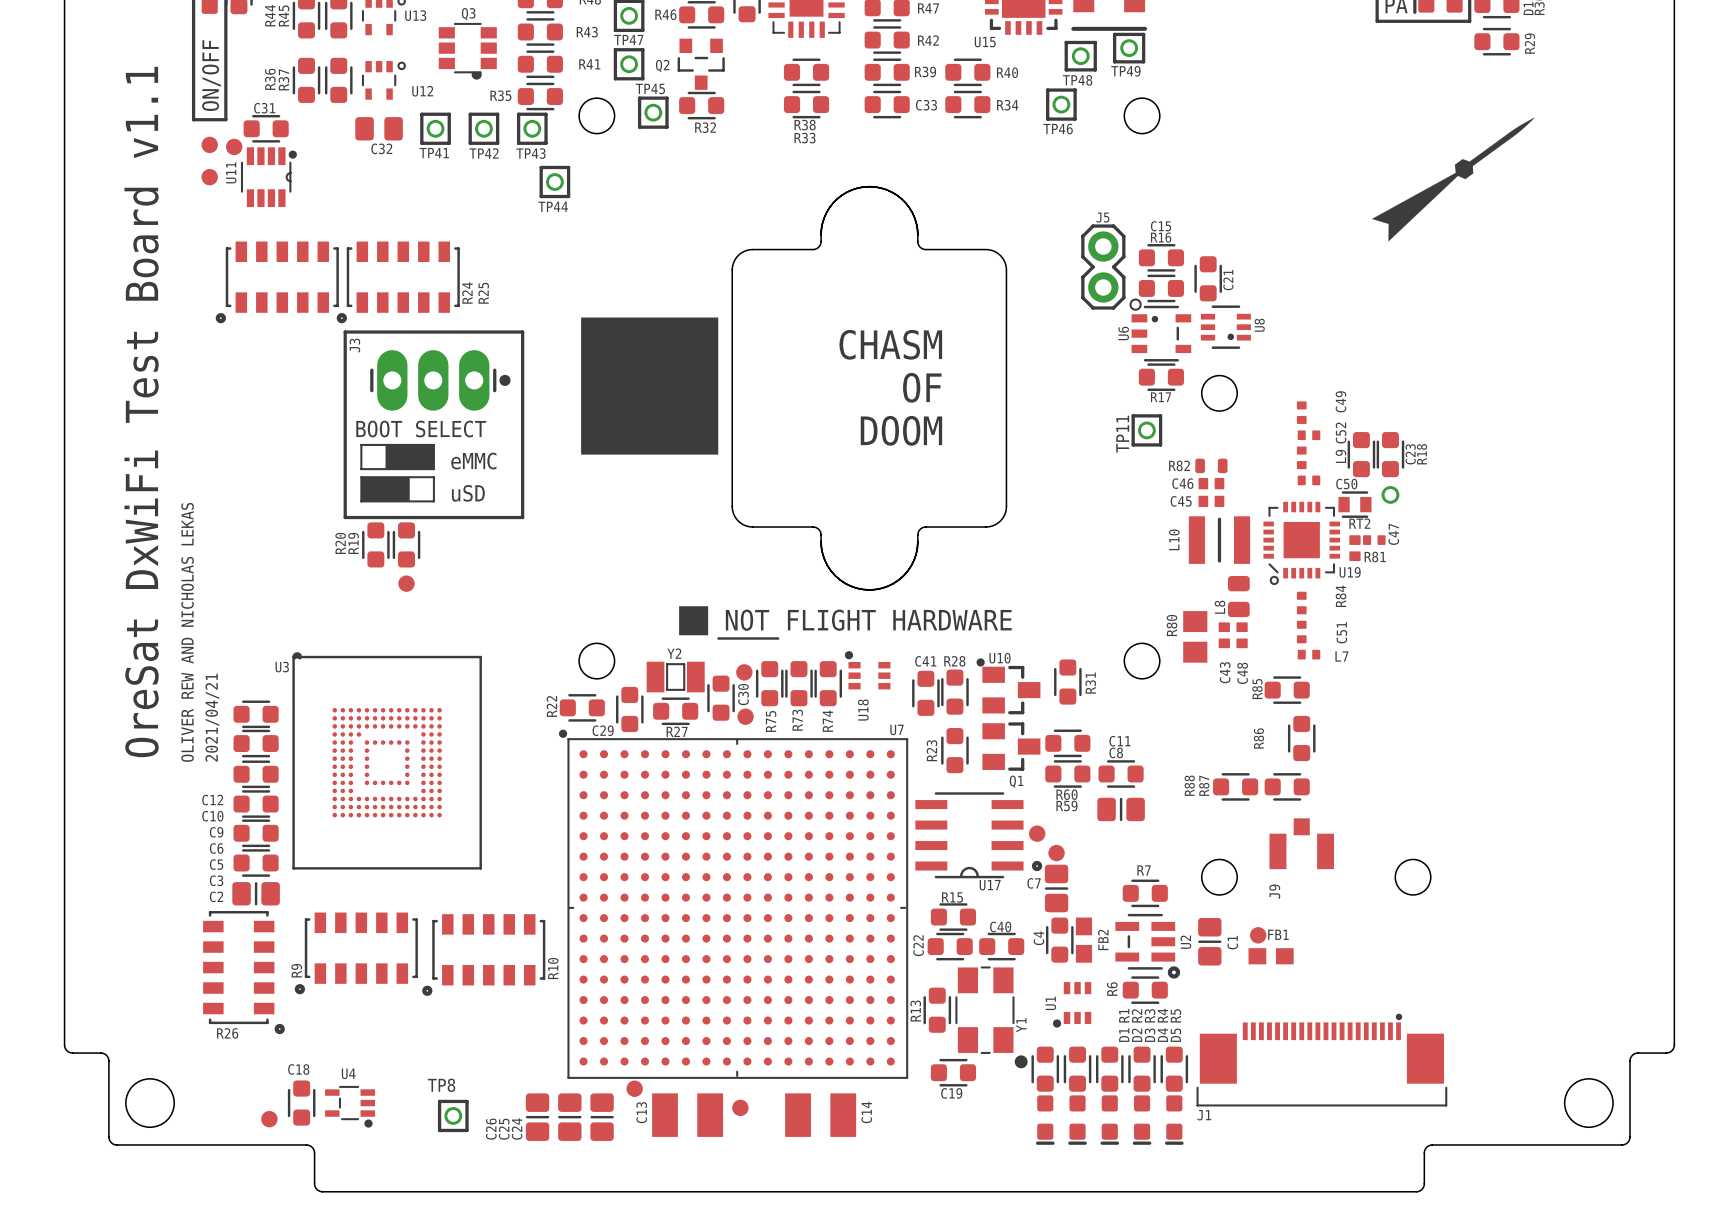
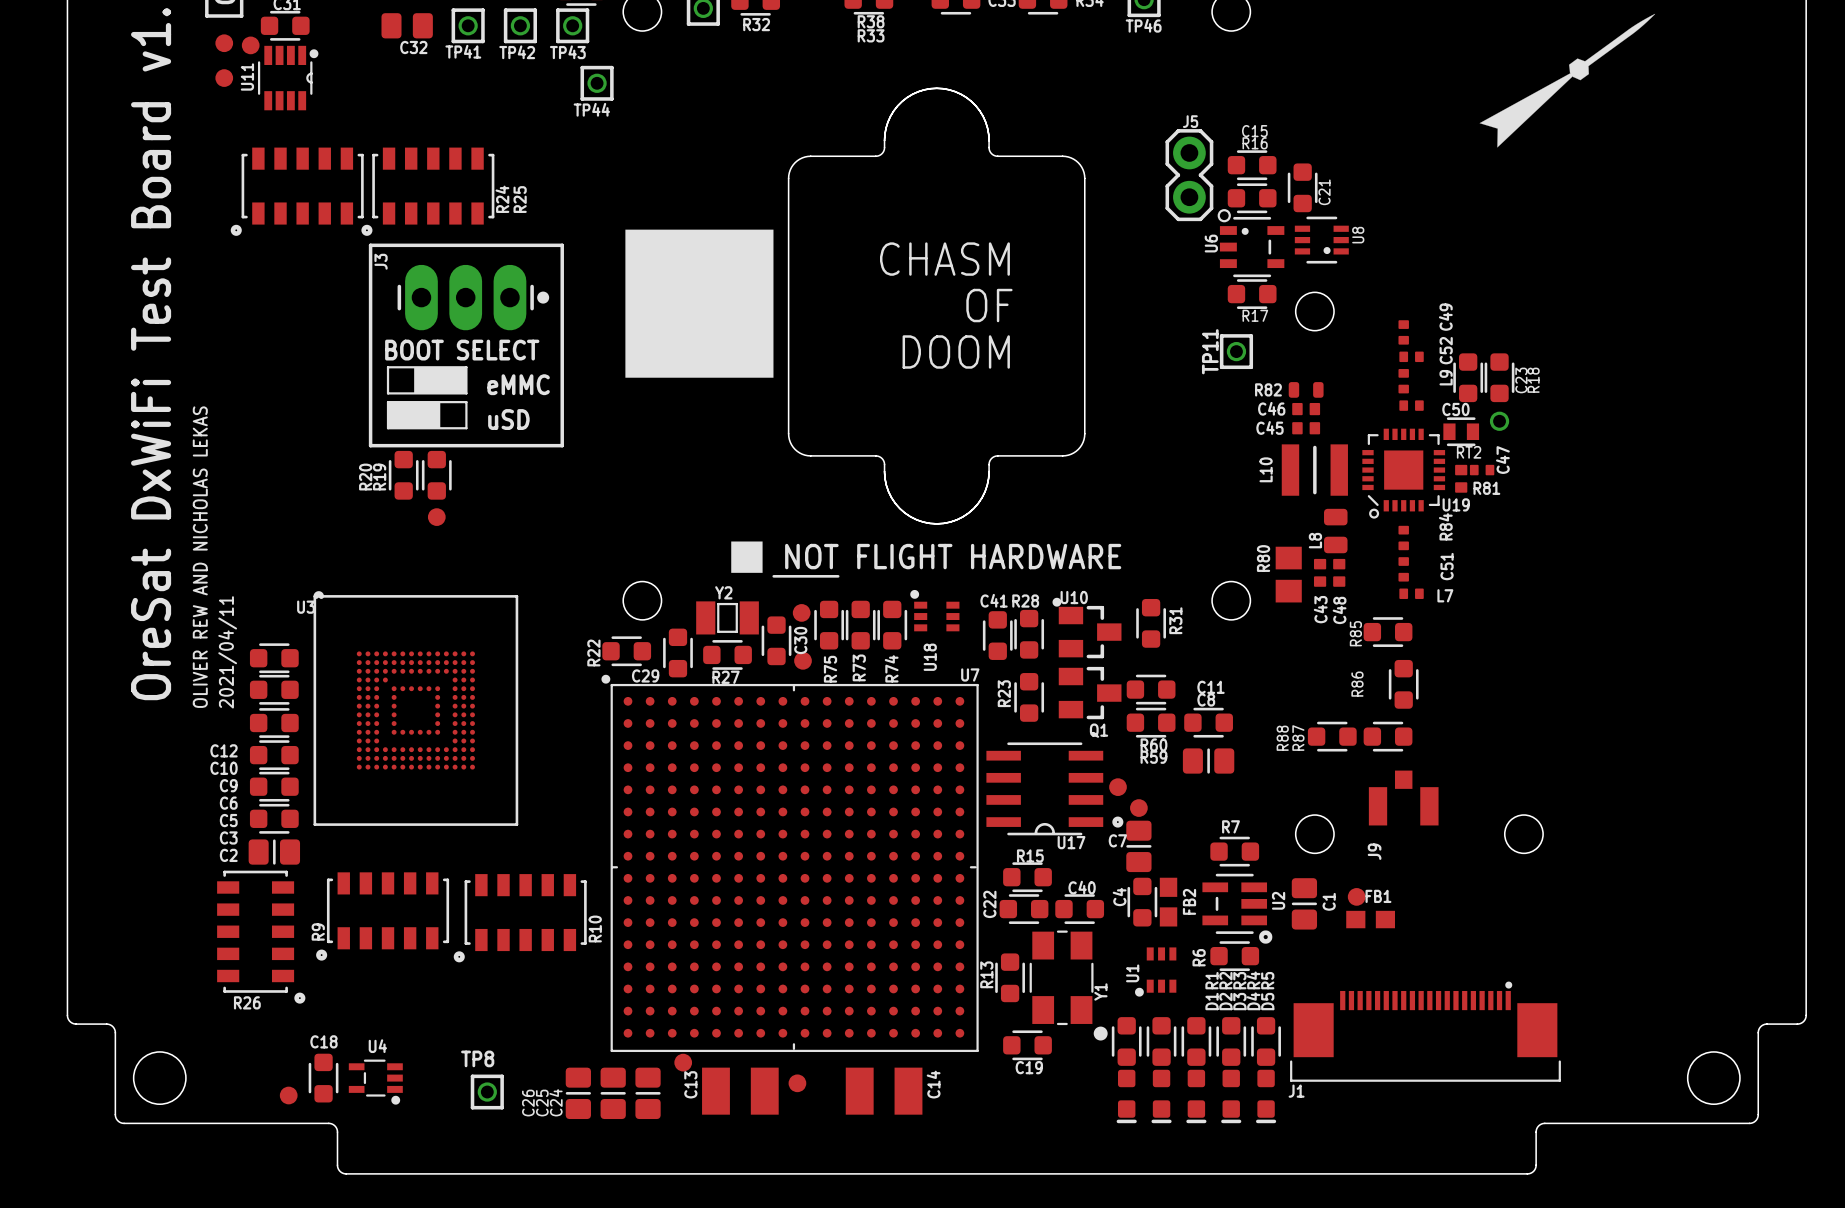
text: 2021/04/21 (212, 717) -> 2021/04/11 (227, 652)

